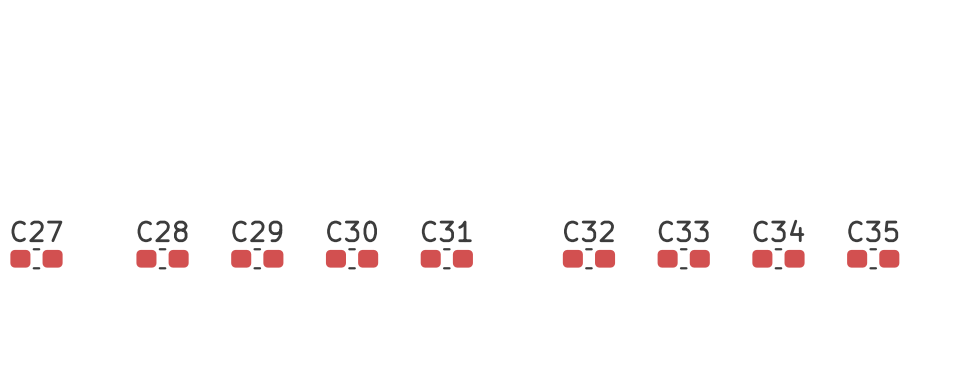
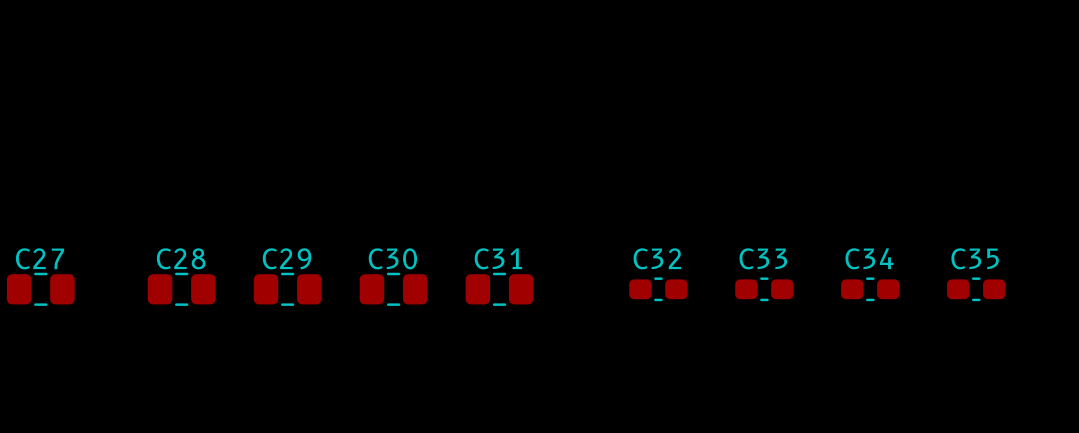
C27 footprint: [10, 248, 63, 270] -> [6, 272, 75, 306]
C28 footprint: [136, 248, 189, 270] -> [147, 272, 216, 306]
C29 footprint: [231, 248, 284, 270] -> [253, 272, 322, 306]
C30 footprint: [325, 248, 379, 270] -> [359, 272, 428, 306]
C31 footprint: [420, 248, 473, 270] -> [465, 272, 534, 306]

